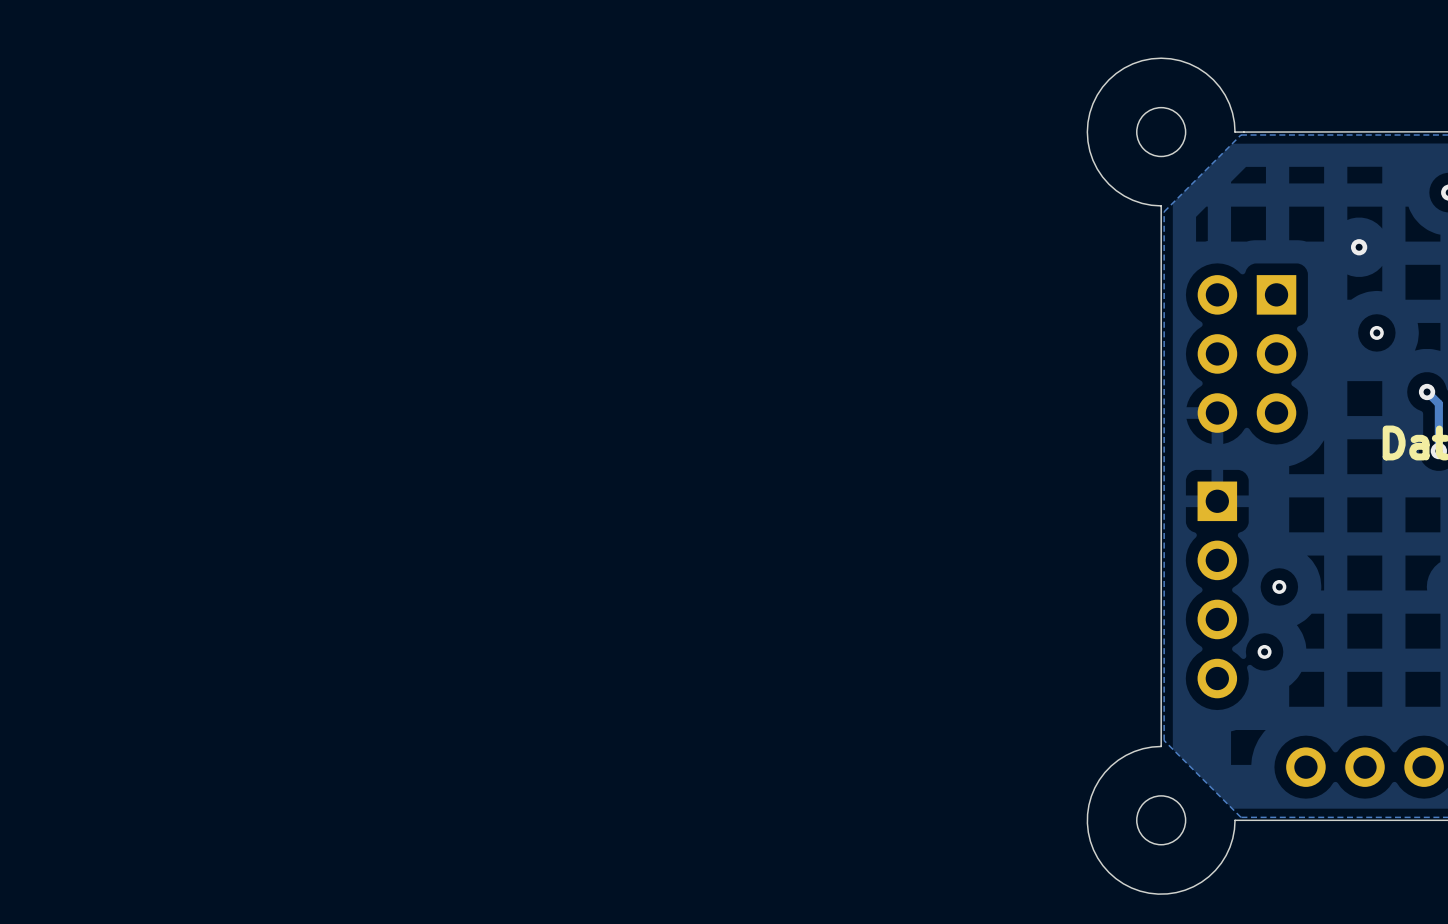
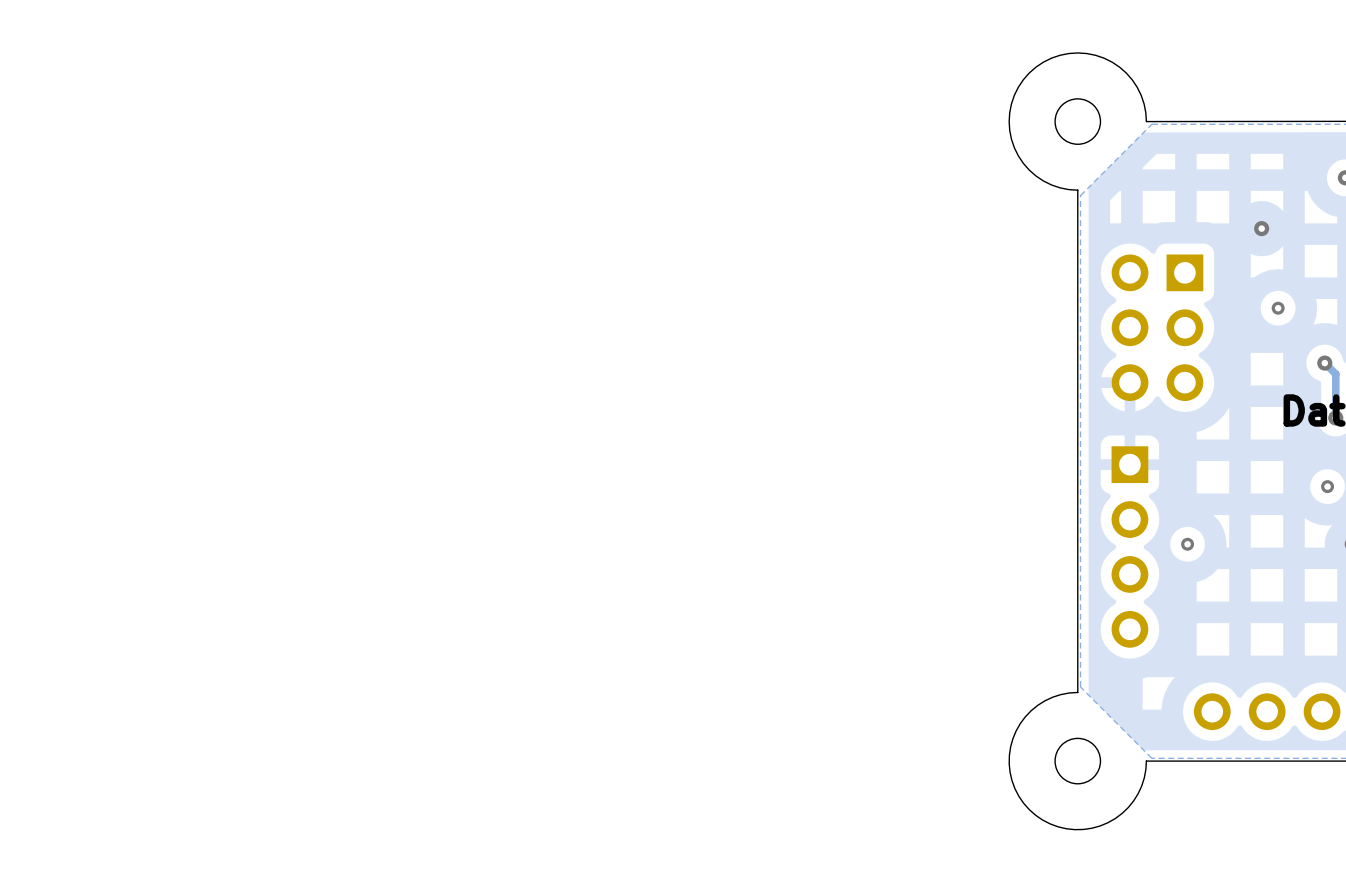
via: none -> (1327, 486)
via: (1264, 651) -> none

